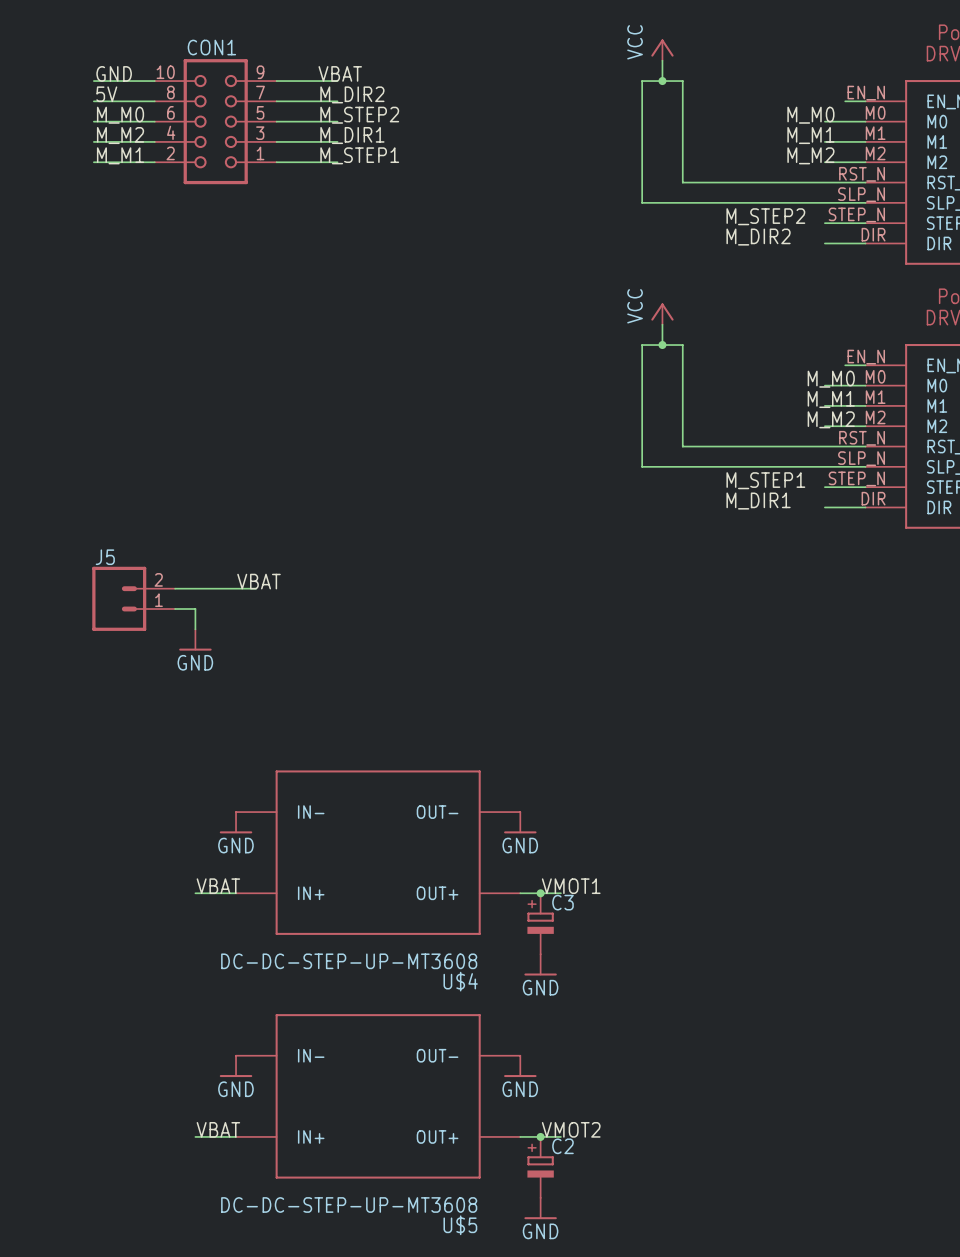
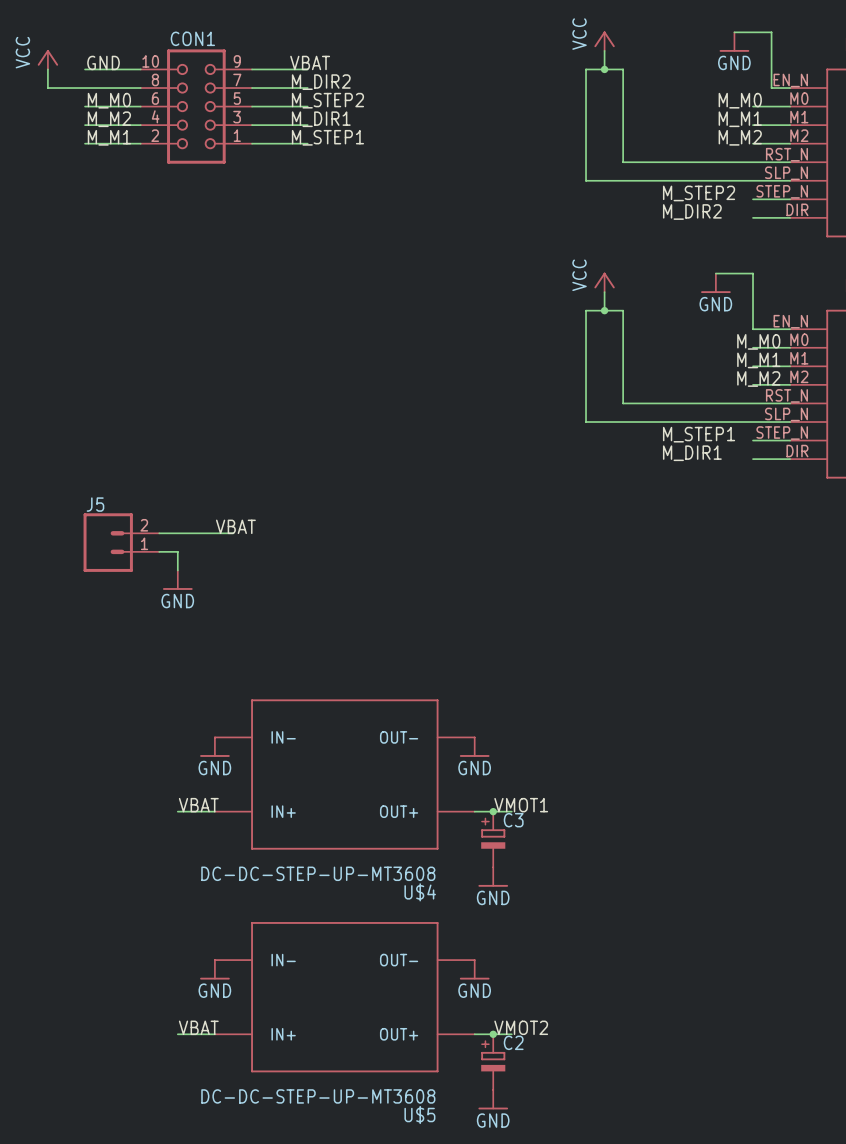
wire: none -> (734, 32) (771, 32) (771, 88)
power symbol: none -> GND (734, 42)
power symbol: none -> VCC (47, 59)
wire: none -> (47, 69) (47, 88) (85, 88)
label: 5V (106, 94) -> none
wire: none -> (715, 273) (753, 273) (753, 329) (771, 329)
power symbol: none -> GND (715, 283)

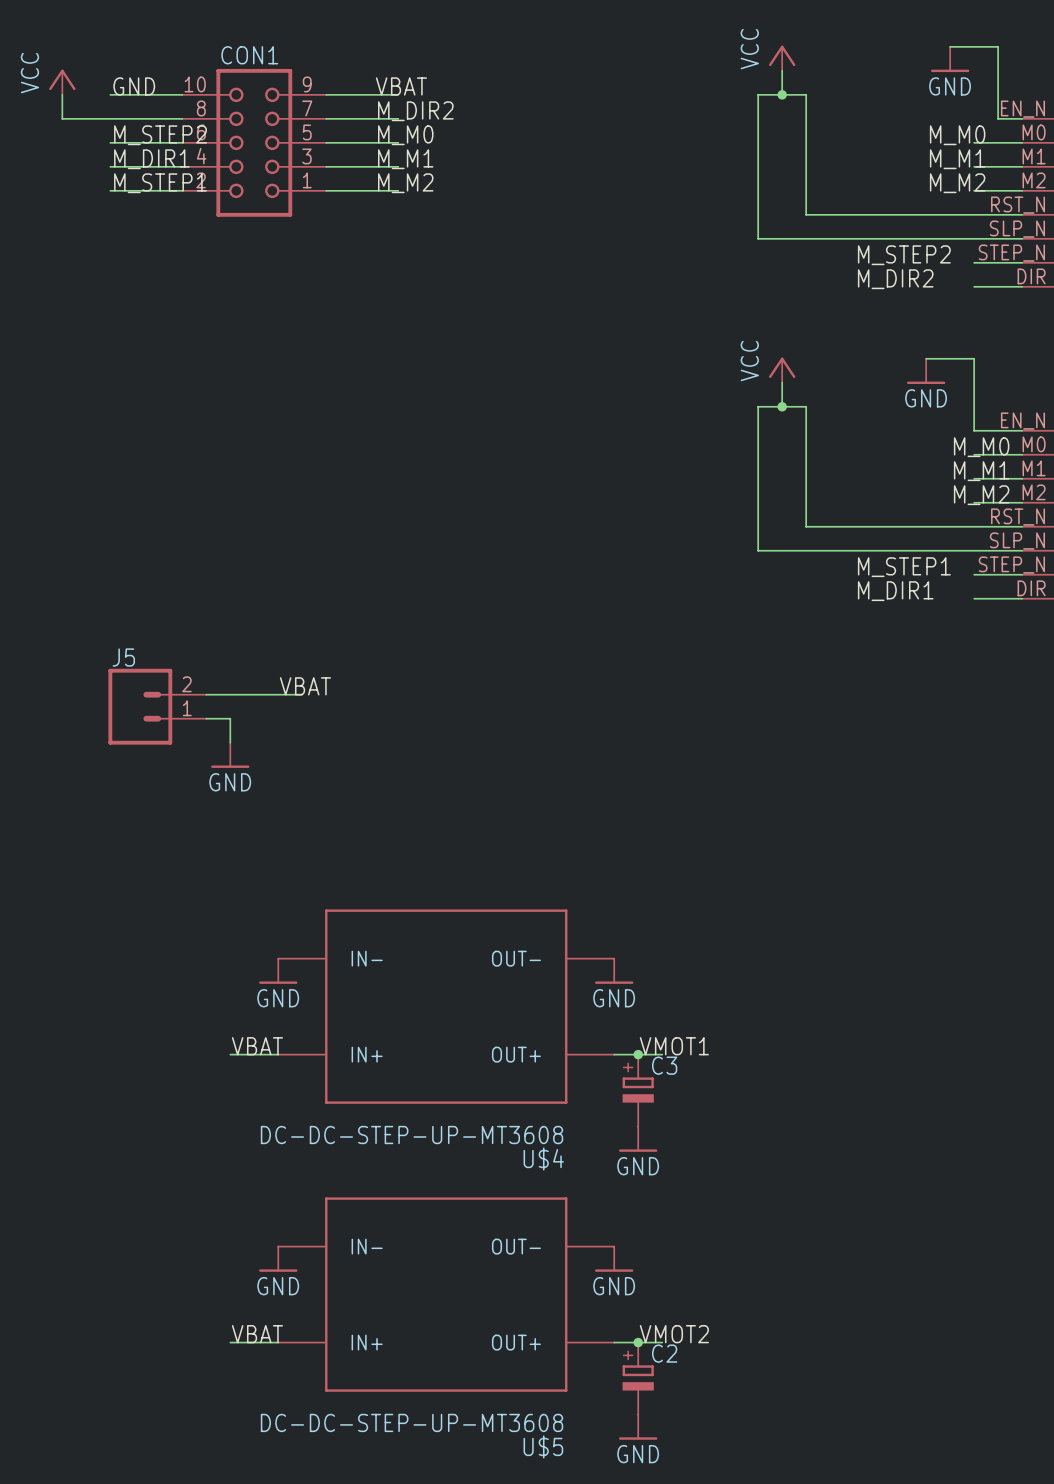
label: M_M0 (109, 100) -> M_STEP2 (160, 135)
label: M_STEP2 (327, 100) -> M_M0 (405, 135)
label: M_M2 (109, 119) -> M_DIR1 (151, 159)
label: M_DIR1 (321, 119) -> M_M1 (405, 159)
label: M_M1 (109, 137) -> M_STEP1 (160, 183)
label: M_STEP1 (327, 137) -> M_M2 (405, 183)

